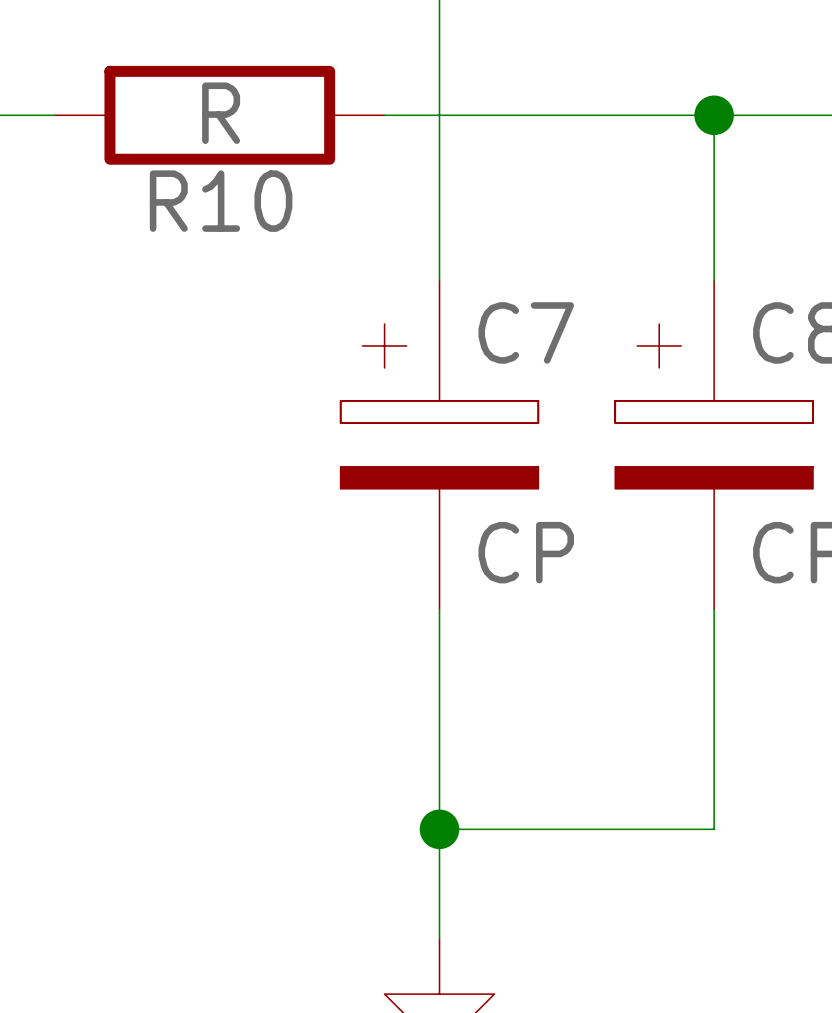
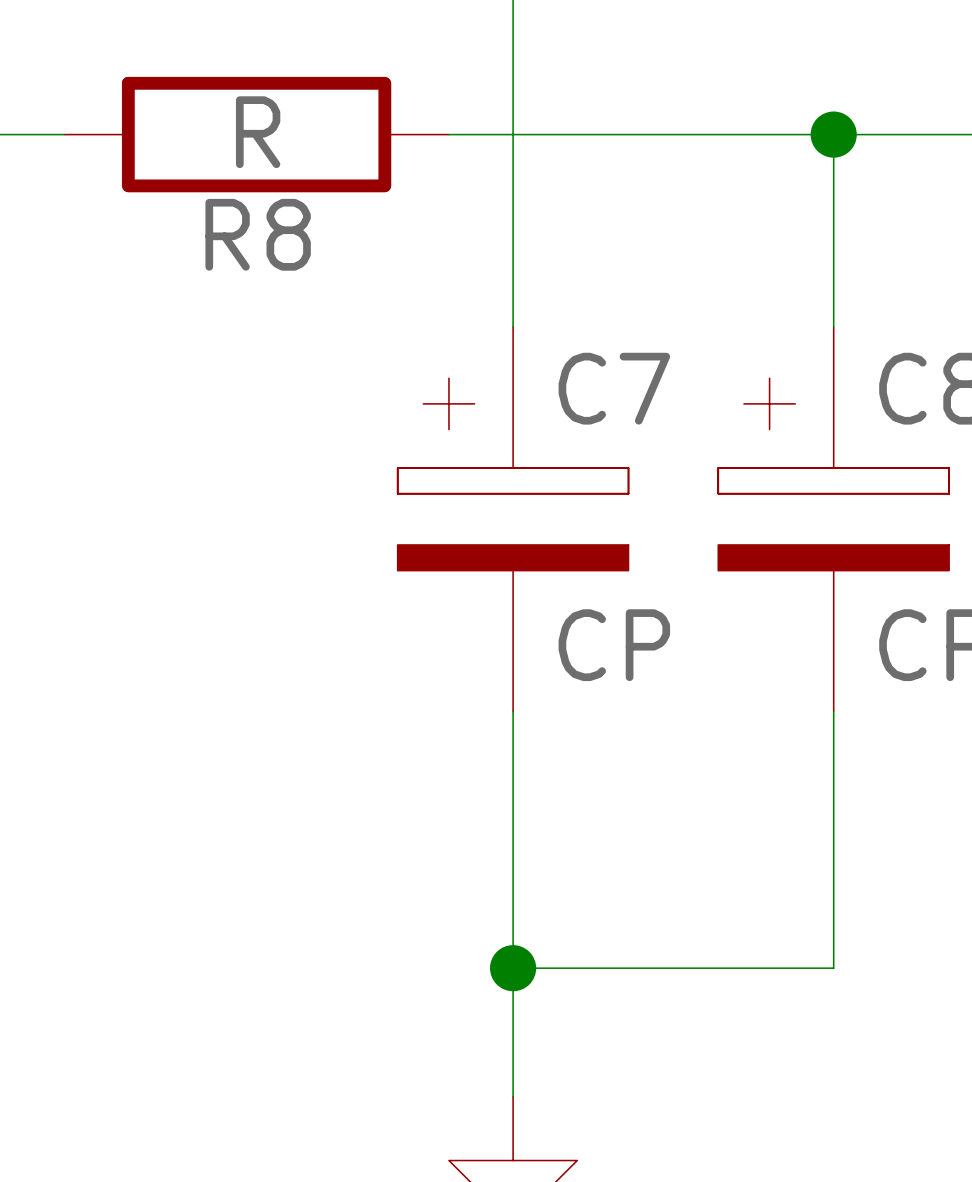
R10 name: R10 (221, 201) -> R8 (258, 234)

